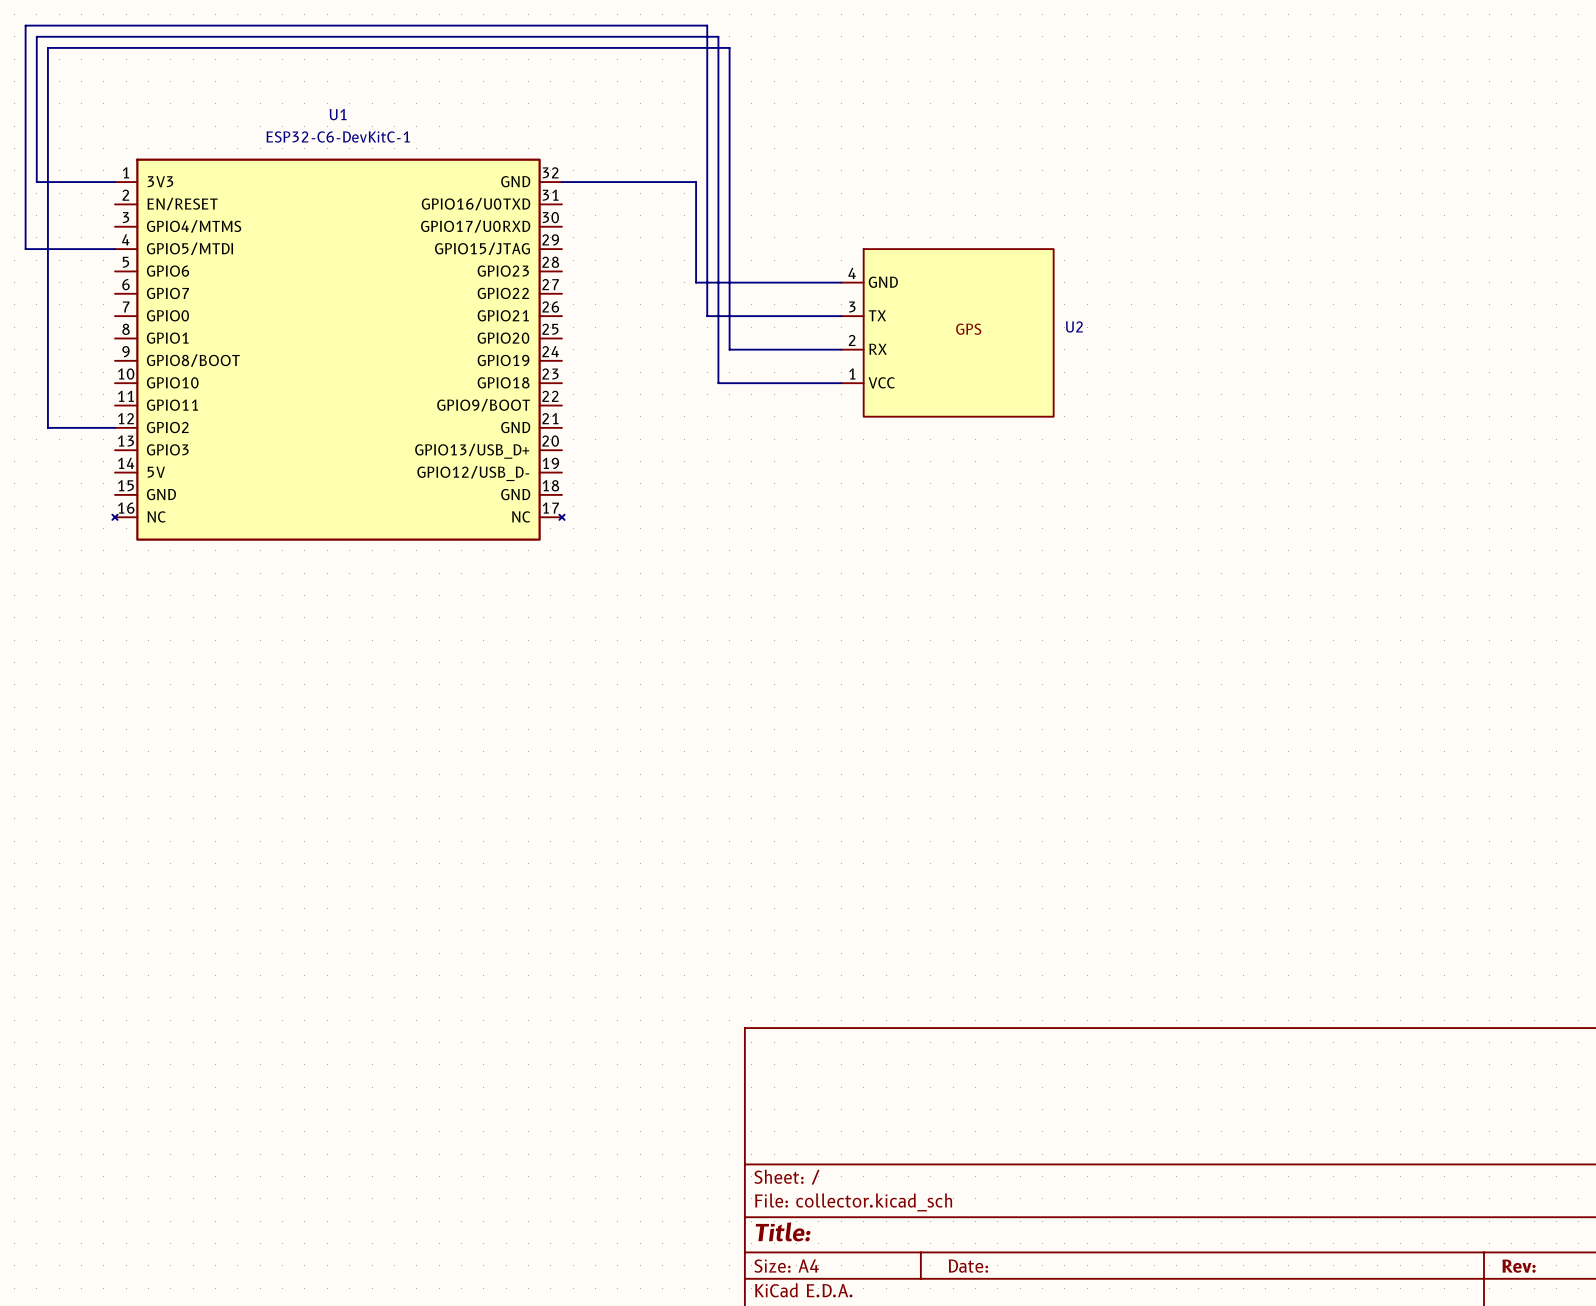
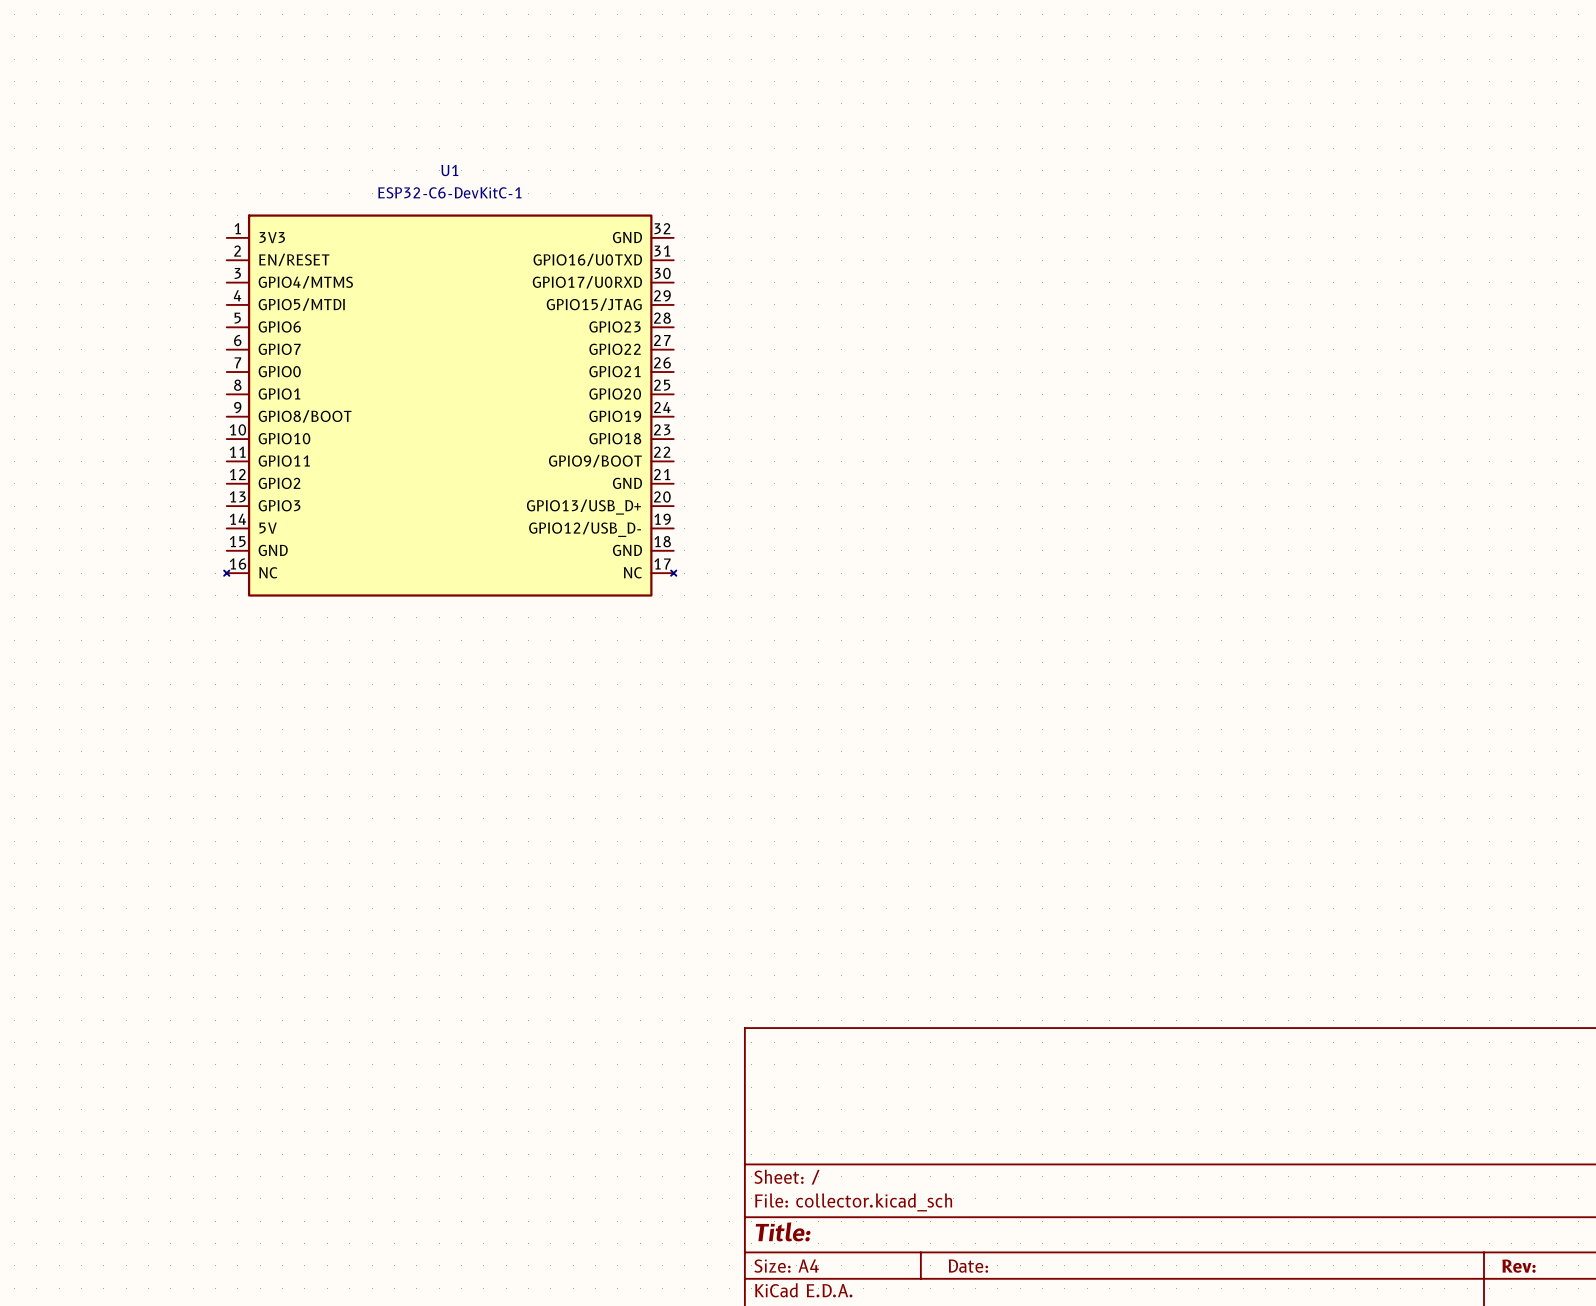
wire: (115, 182) (36, 182) (36, 36) (718, 36) (718, 383) (841, 383) -> none
wire: (561, 182) (696, 182) (696, 282) (841, 282) -> none
wire: (115, 249) (25, 249) (25, 25) (707, 25) (707, 316) (841, 316) -> none
U2: (947, 332) -> none
U1 position: (338, 349) -> (450, 405)
wire: (841, 349) (729, 349) (729, 47) (47, 47) (47, 427) (115, 427) -> none

